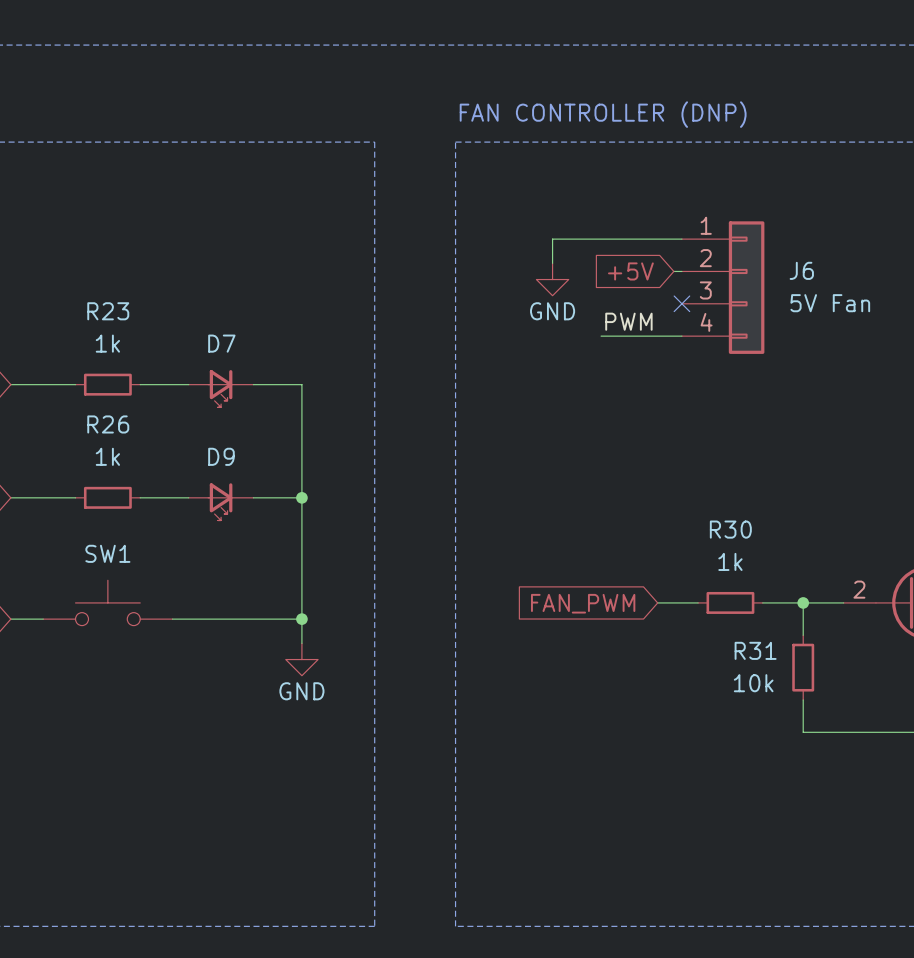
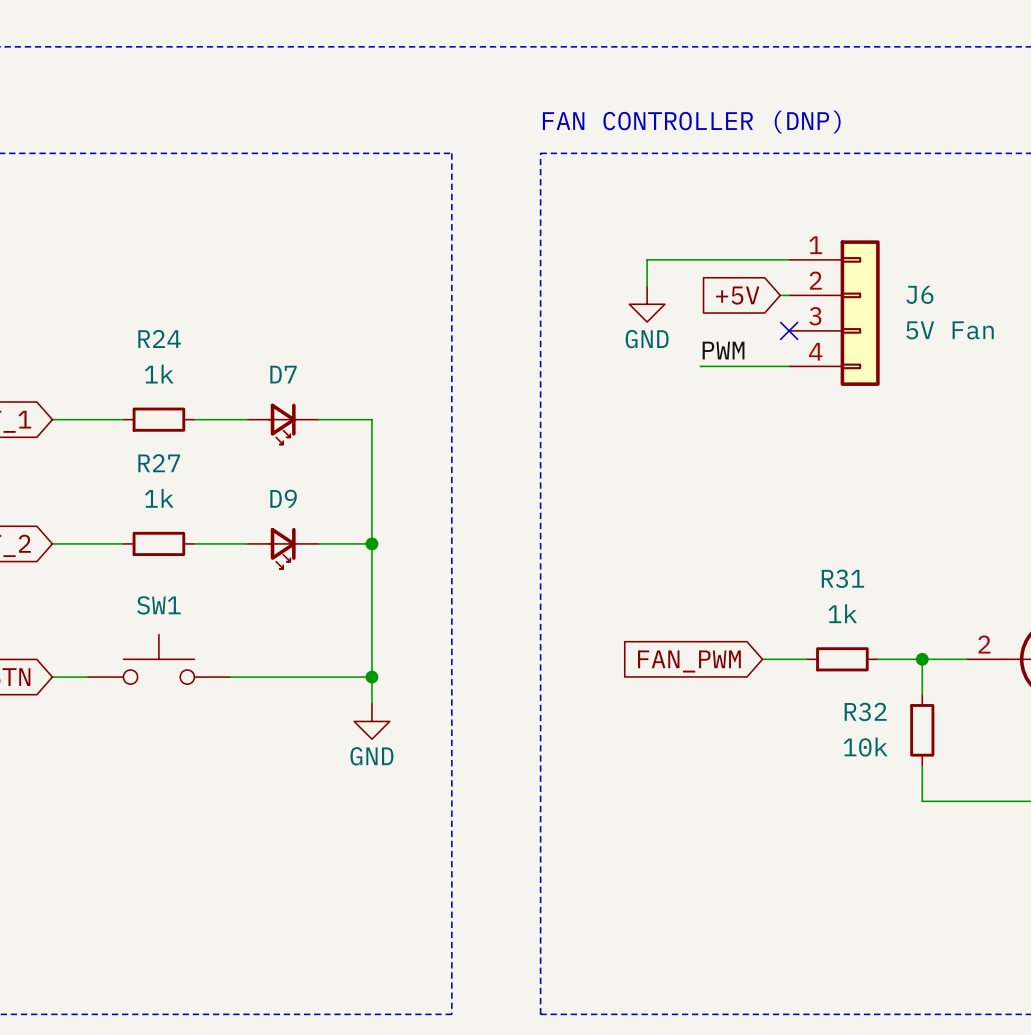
R23 name: R23 (108, 311) -> R24 (159, 338)
R26 name: R26 (108, 424) -> R27 (159, 463)
R30 name: R30 (730, 529) -> R31 (842, 578)
R31 name: R31 (755, 650) -> R32 (865, 711)

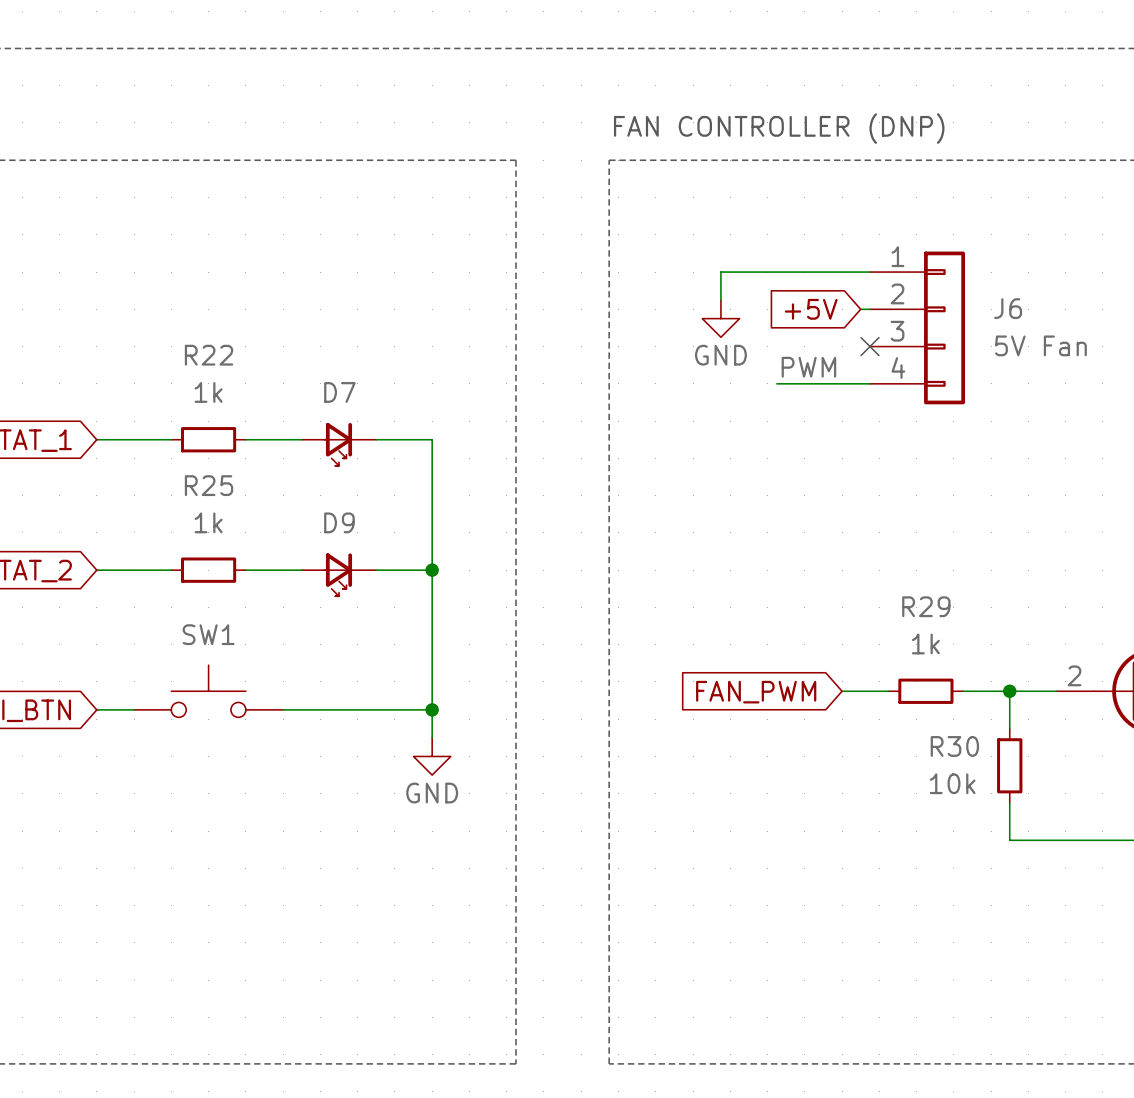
R24 name: R24 (159, 338) -> R22 (209, 355)
R27 name: R27 (159, 463) -> R25 (209, 485)
R31 name: R31 (842, 578) -> R29 (926, 606)
R32 name: R32 (865, 711) -> R30 (954, 746)

